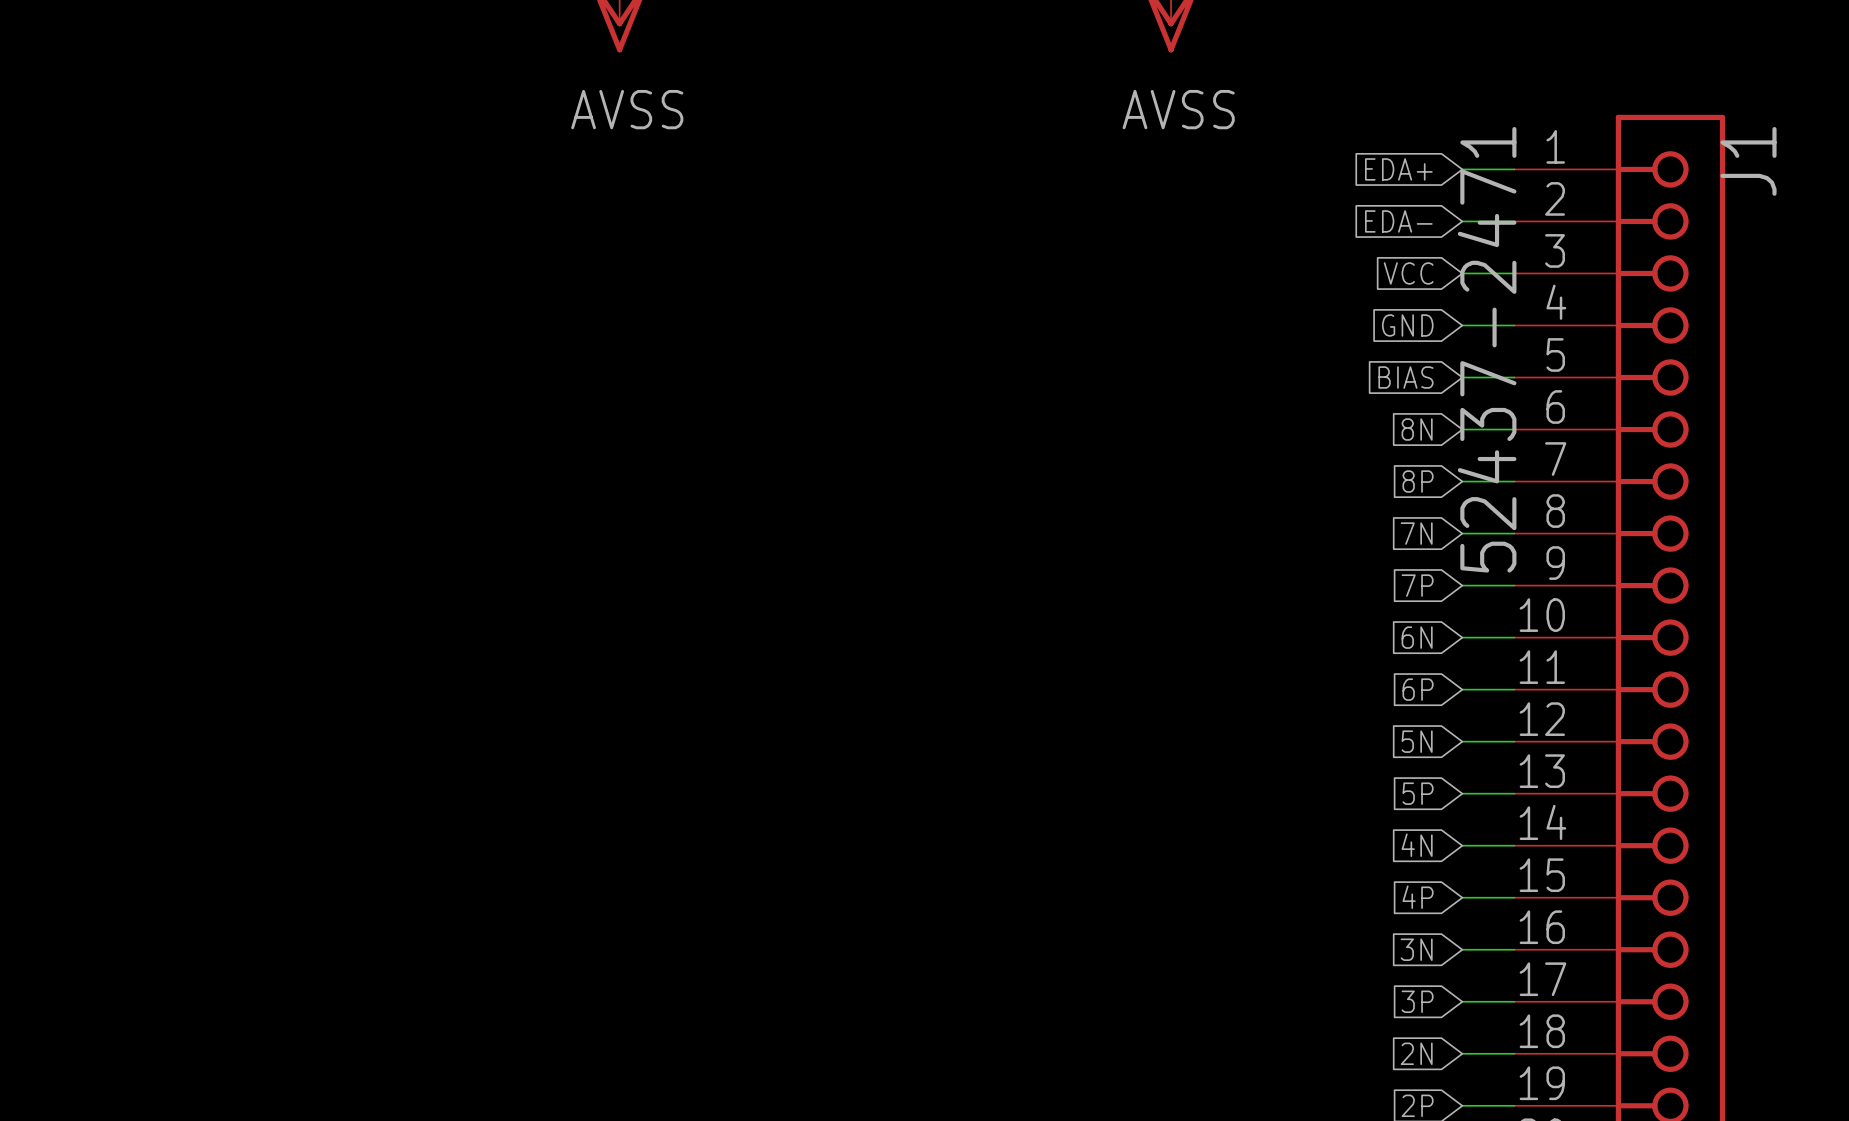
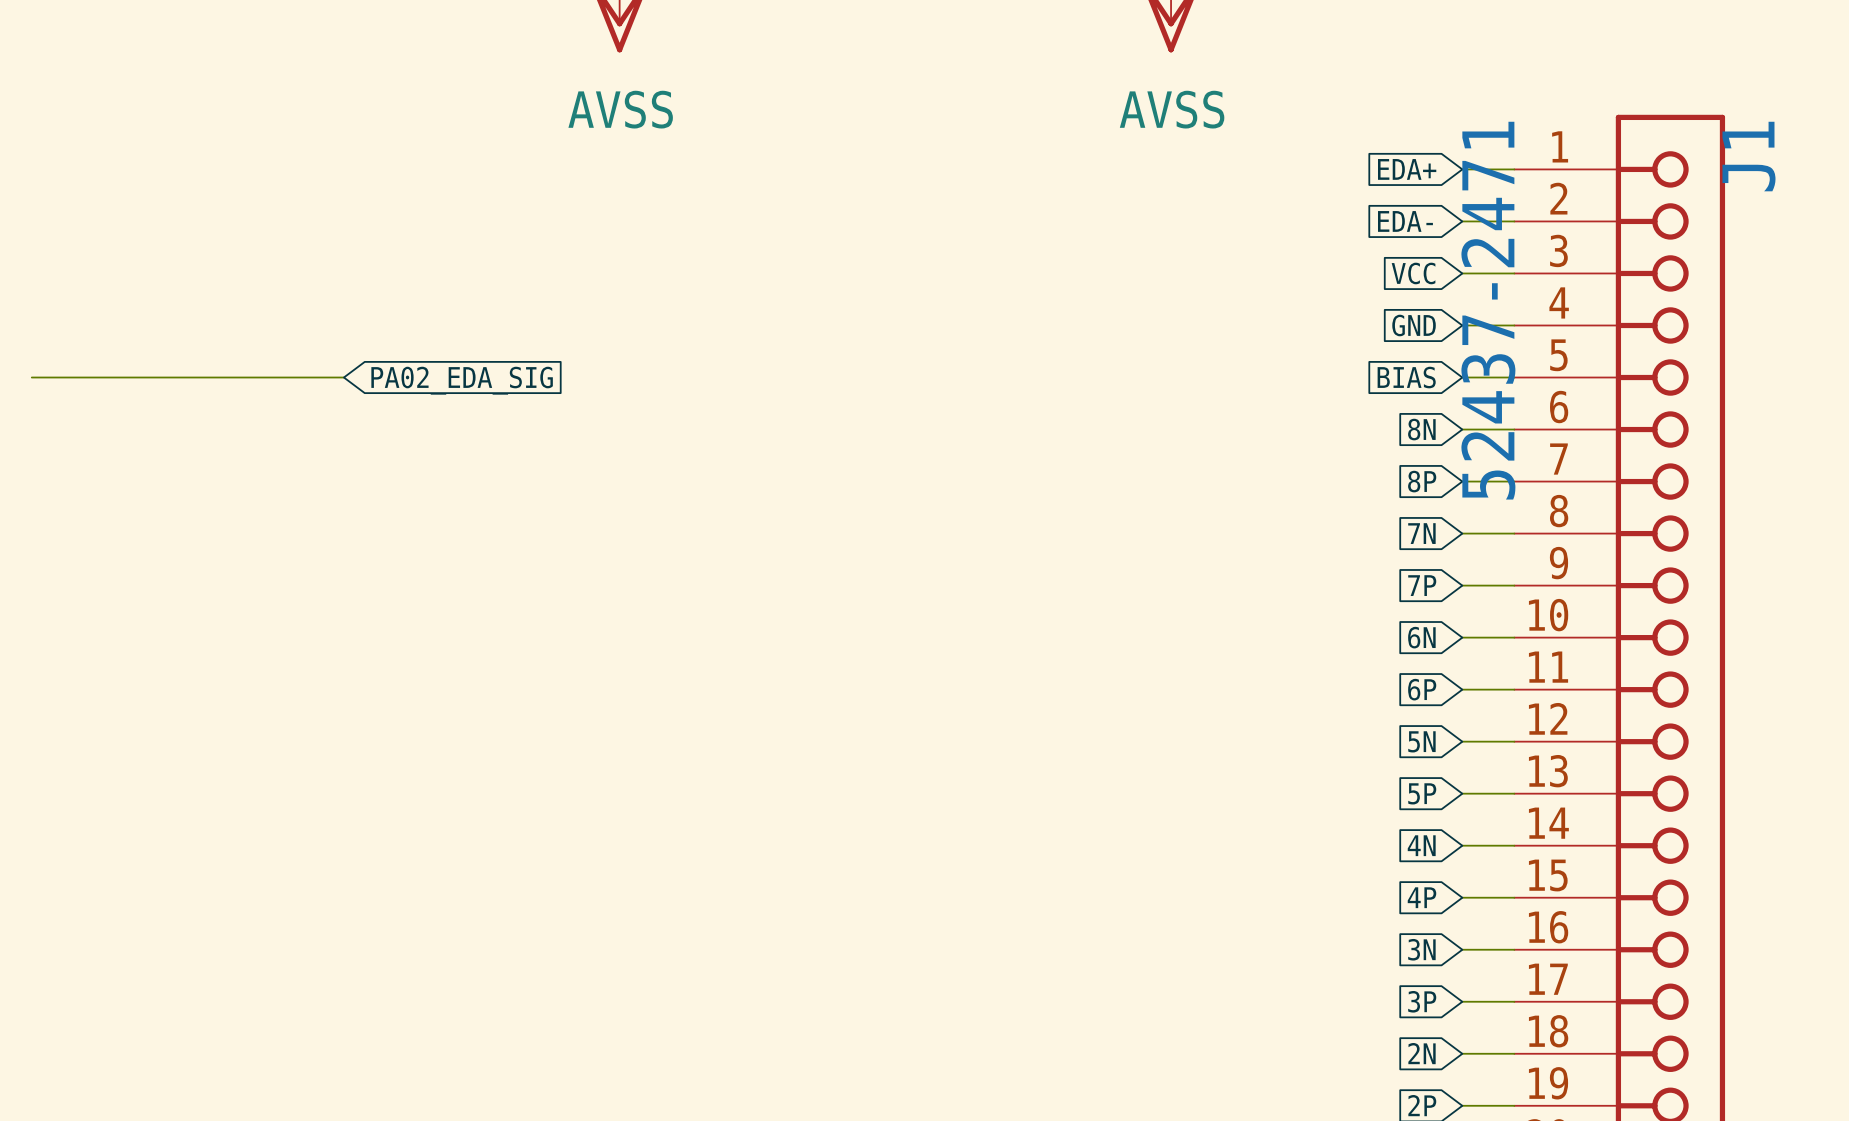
wire: none -> (31, 377) (343, 377)
global label: none -> PA02_EDA_SIG (462, 380)

